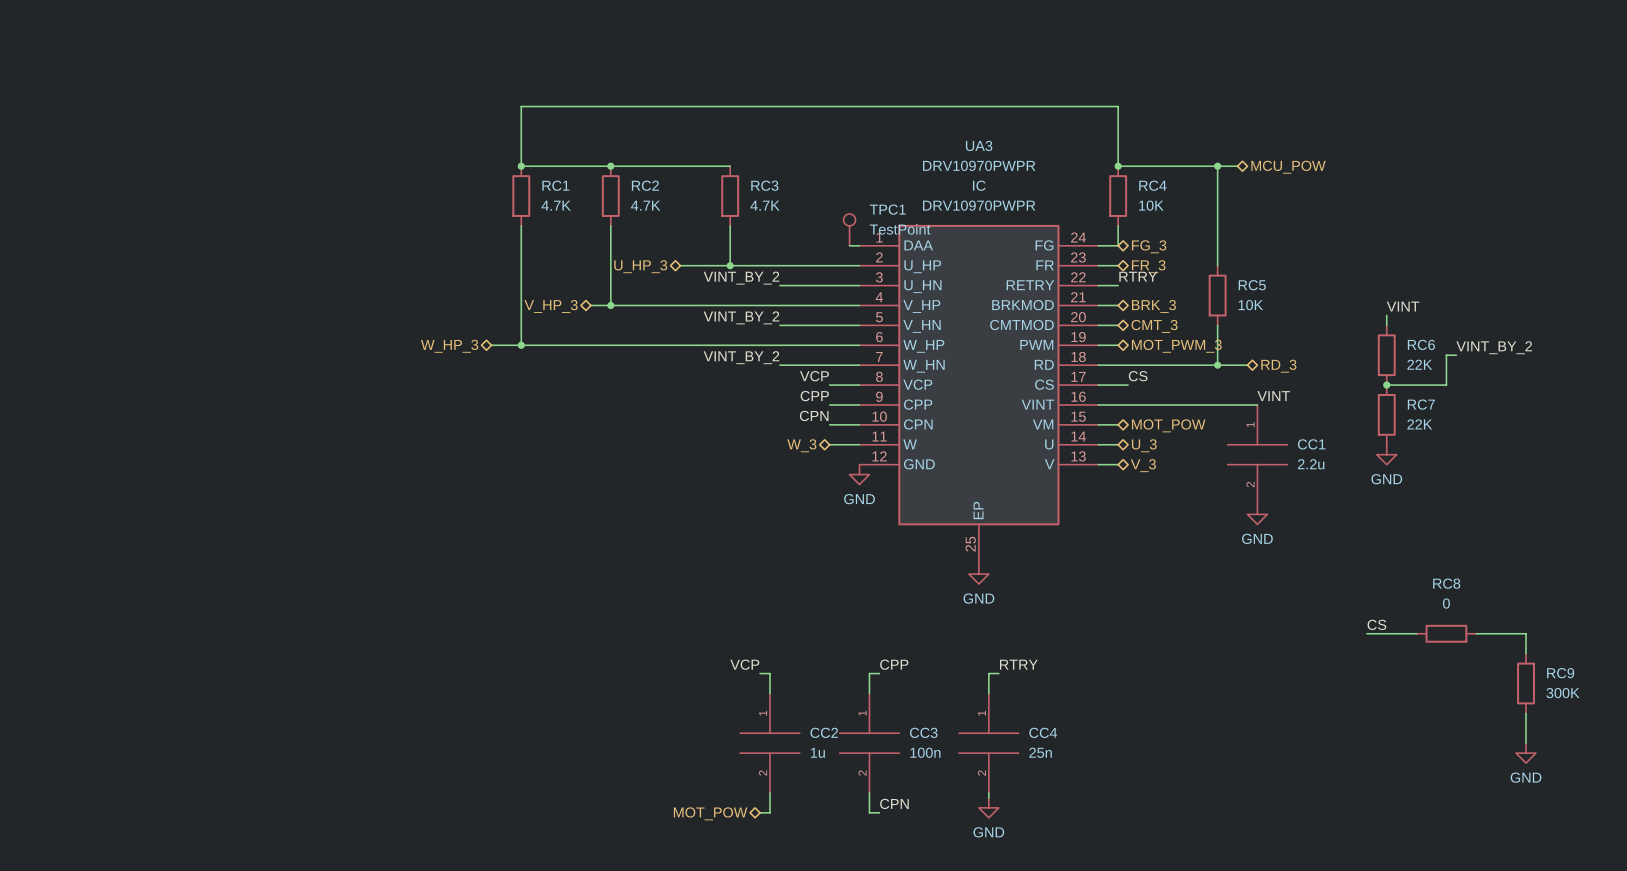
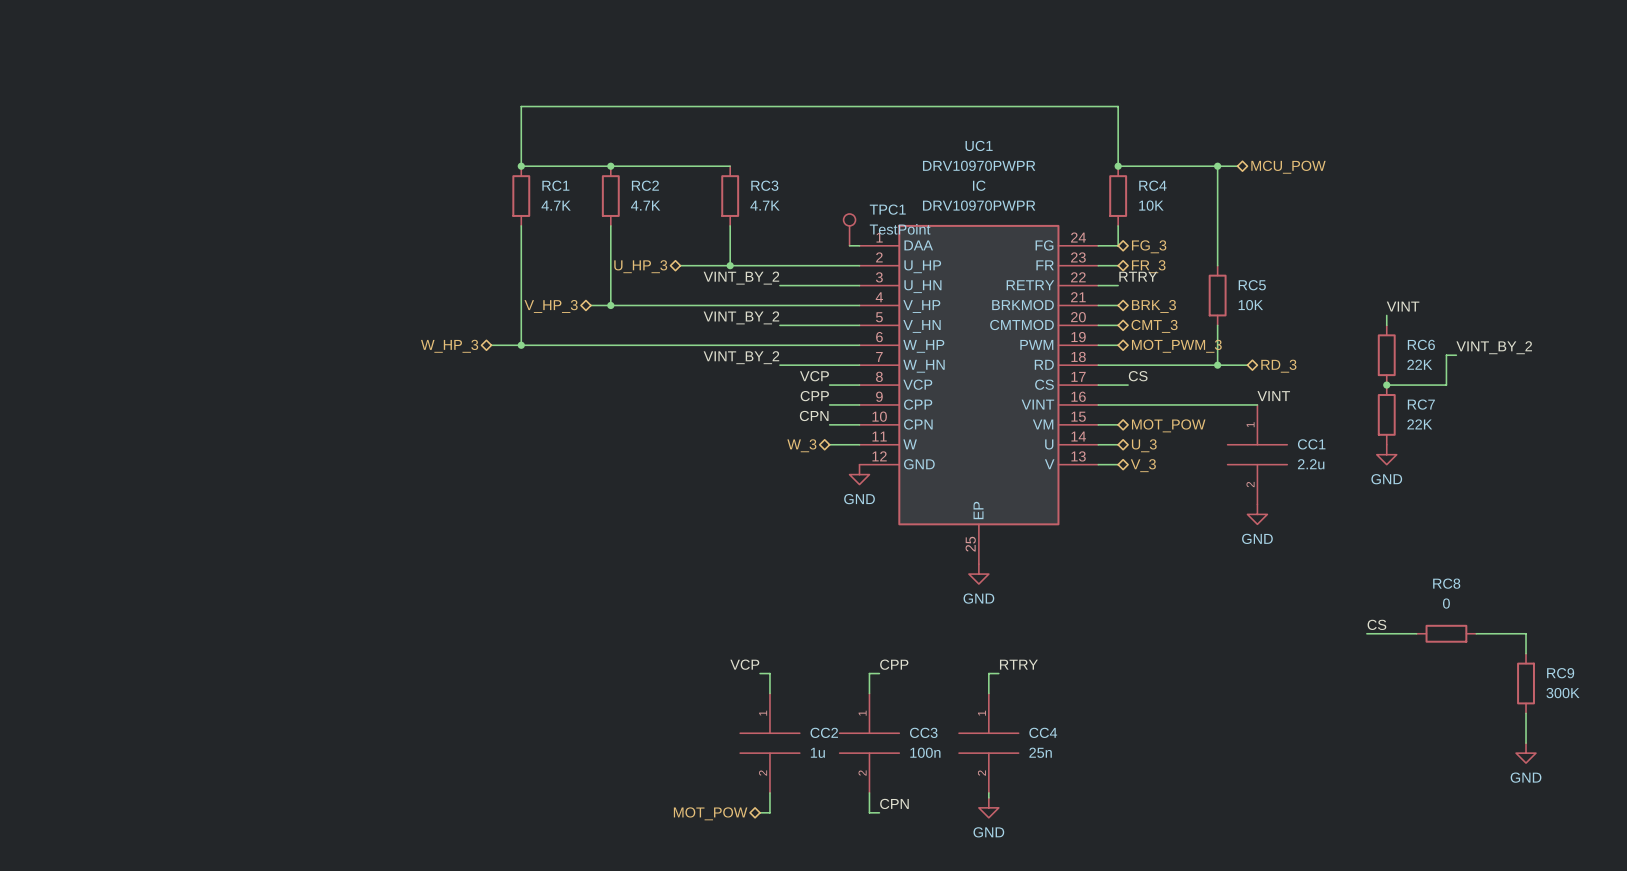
UA3 name: UA3 (979, 145) -> UC1 (979, 145)

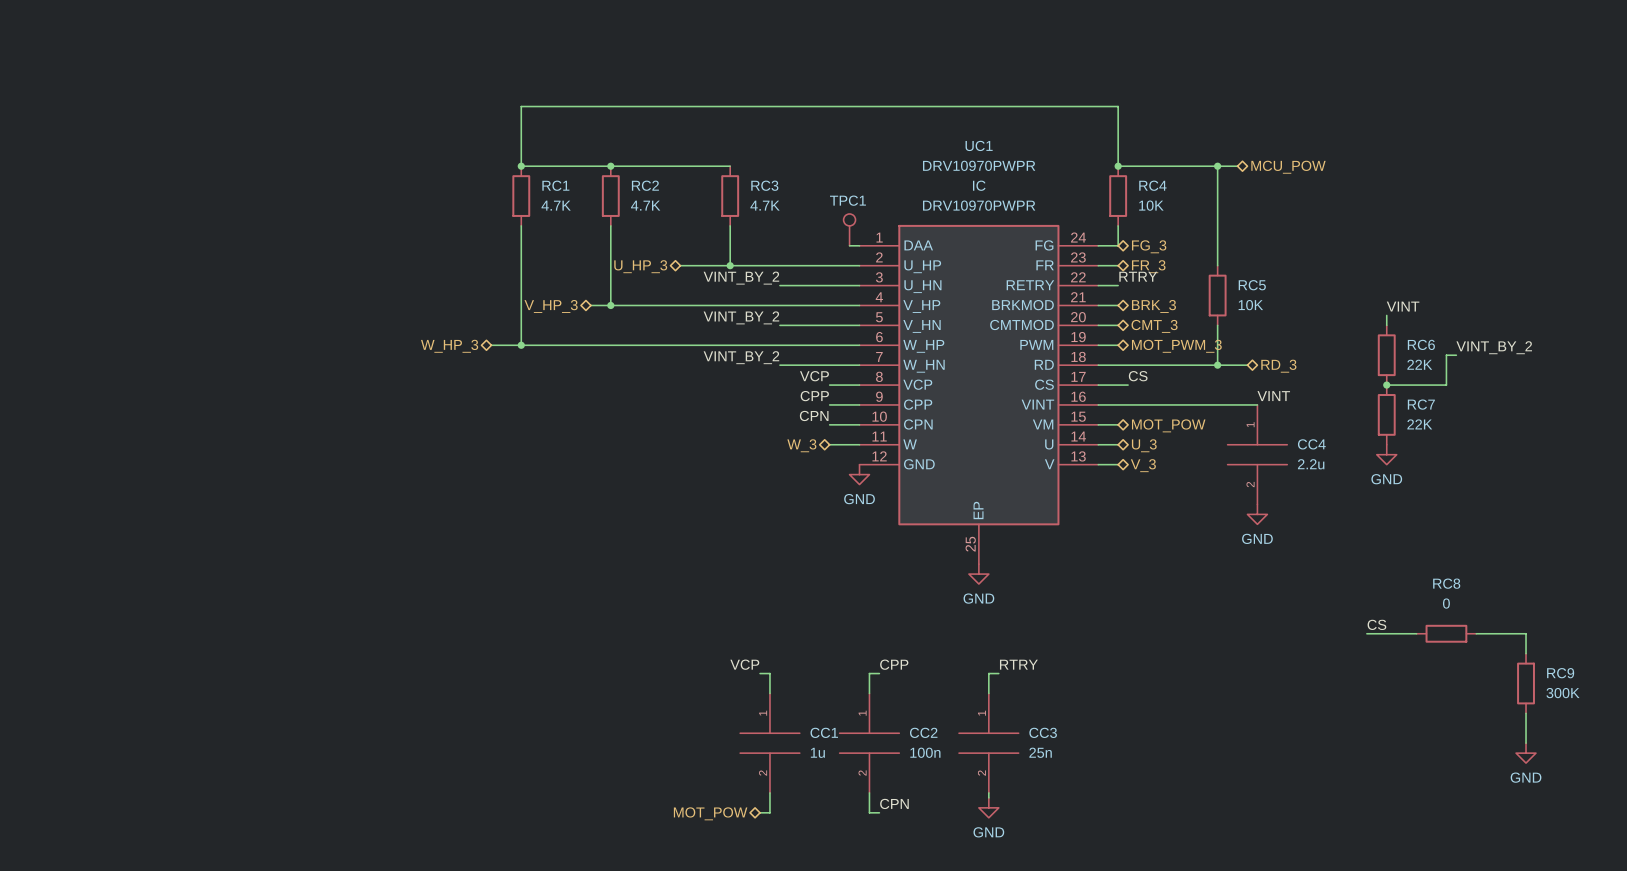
TPC1 name position: TPC1 (887, 209) -> TPC1 (847, 200)
TPC1 value: TestPoint (900, 229) -> none
CC1 name: CC1 (1311, 444) -> CC4 (1311, 444)
CC2 name: CC2 (824, 732) -> CC1 (824, 732)
CC3 name: CC3 (923, 732) -> CC2 (923, 732)
CC4 name: CC4 (1043, 732) -> CC3 (1043, 732)

